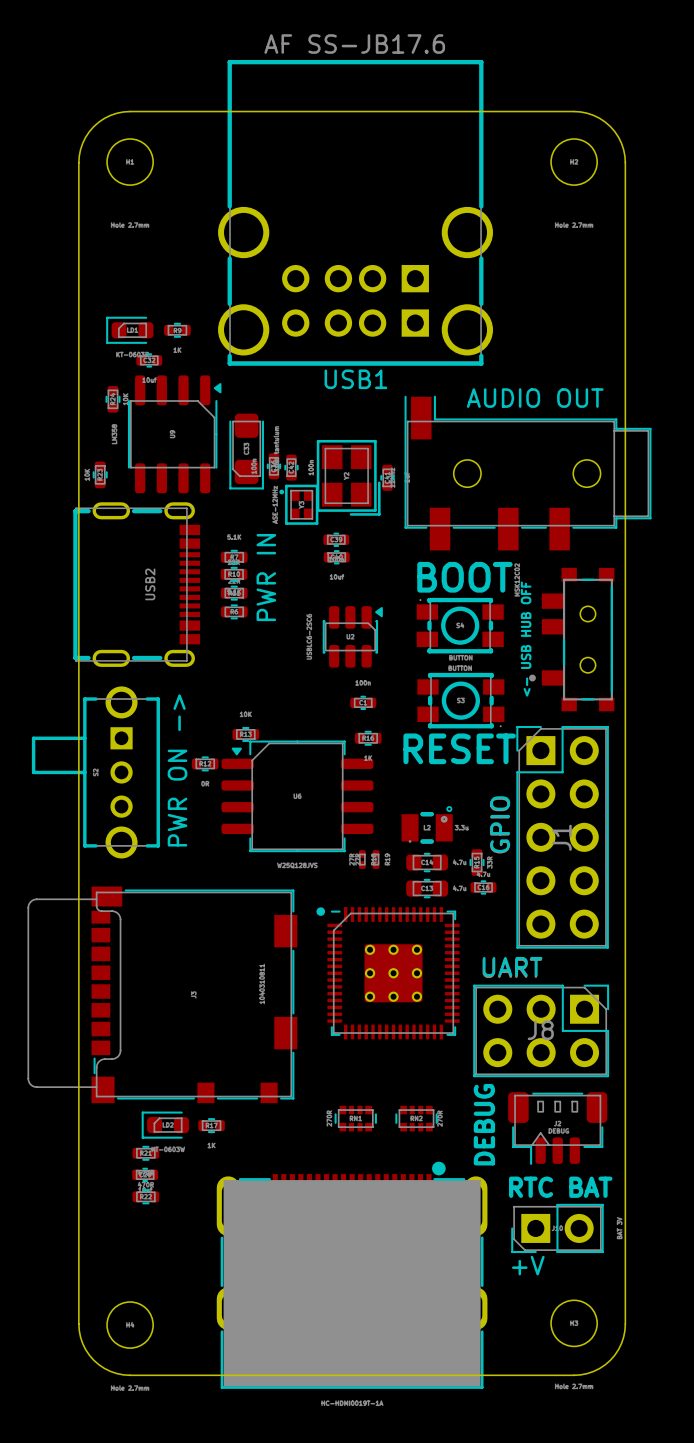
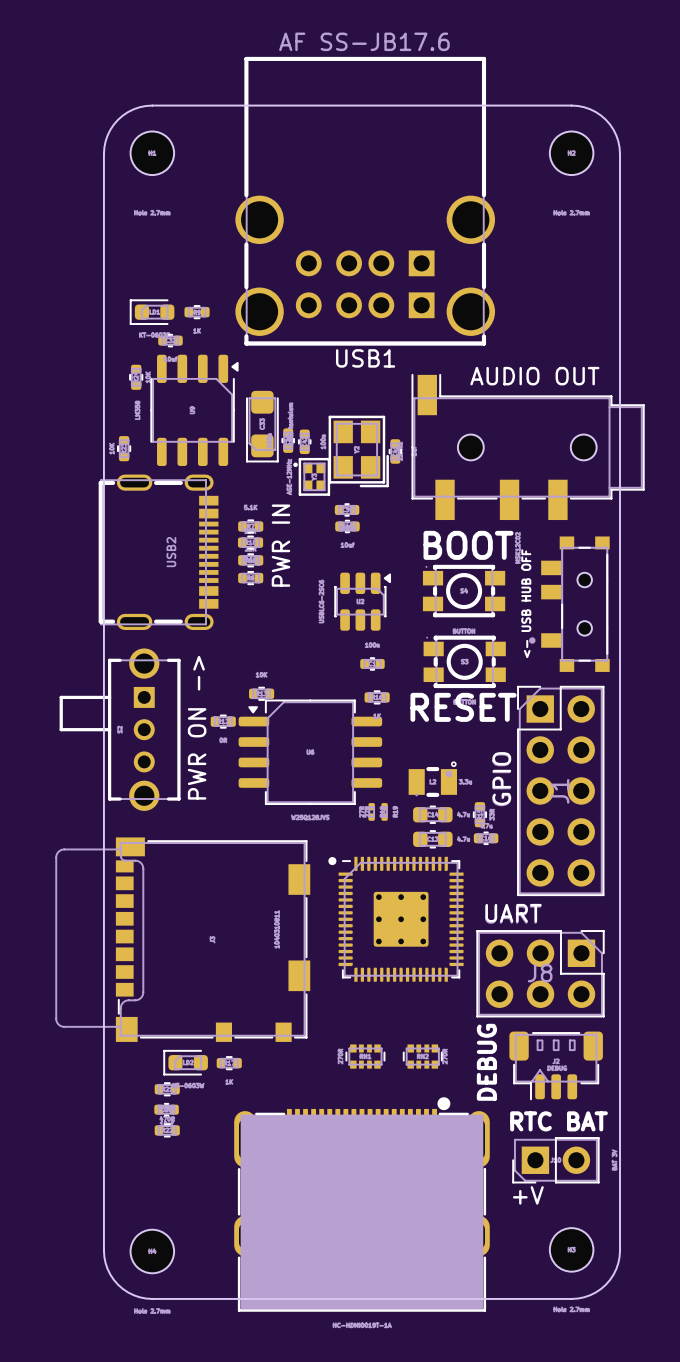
part rotation: 0° (460, 700) -> 180° (464, 661)

